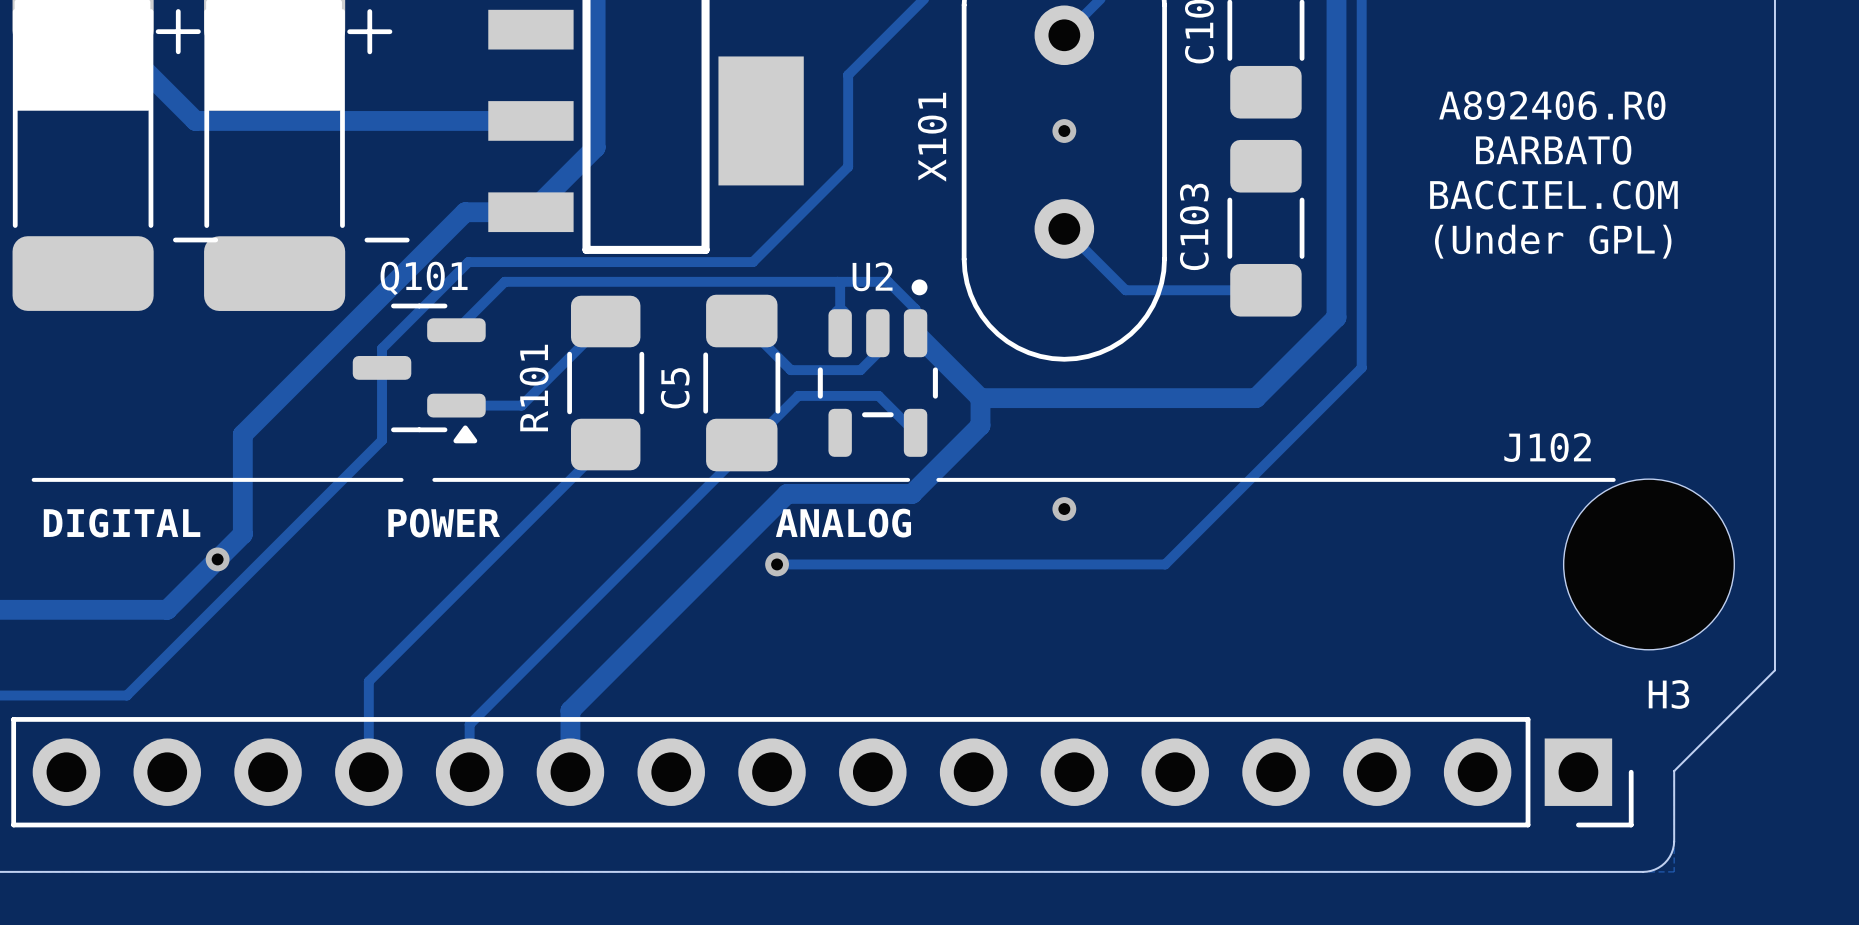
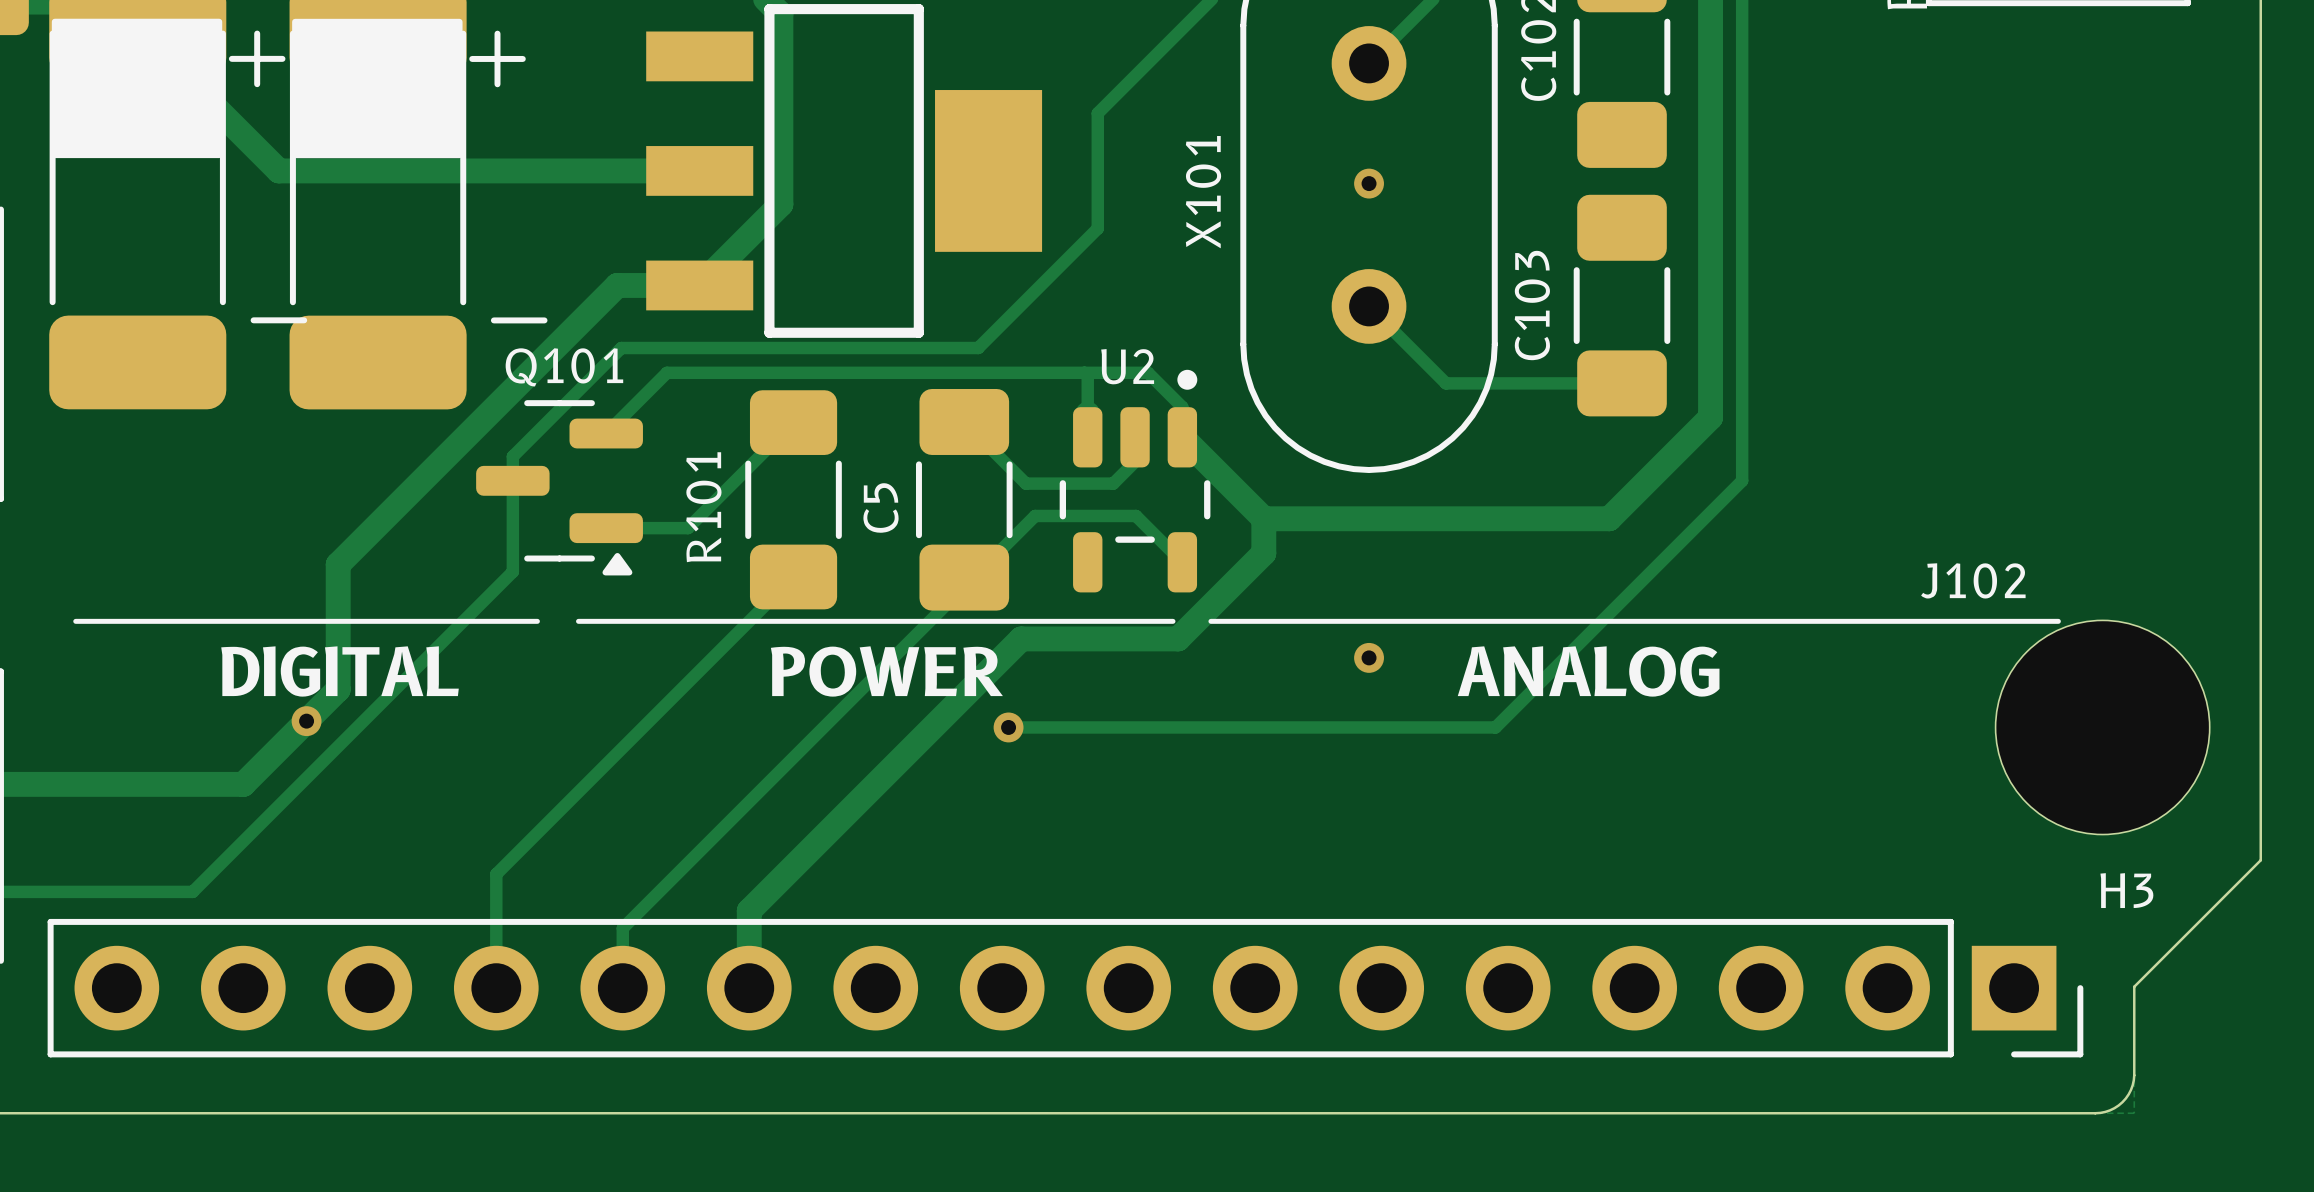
text: A892406.R0 (1552, 105) -> none
text: BARBATO (1553, 150) -> none
text: BACCIEL.COM (1553, 195) -> none
text: (Under GPL) (1553, 241) -> none
J102 text: none -> DIGITAL (340, 671)
J102 text: none -> POWER (886, 671)
J102 text: none -> ANALOG (1588, 671)
J102 text: DIGITAL POWER ANALOG (477, 523) -> none

